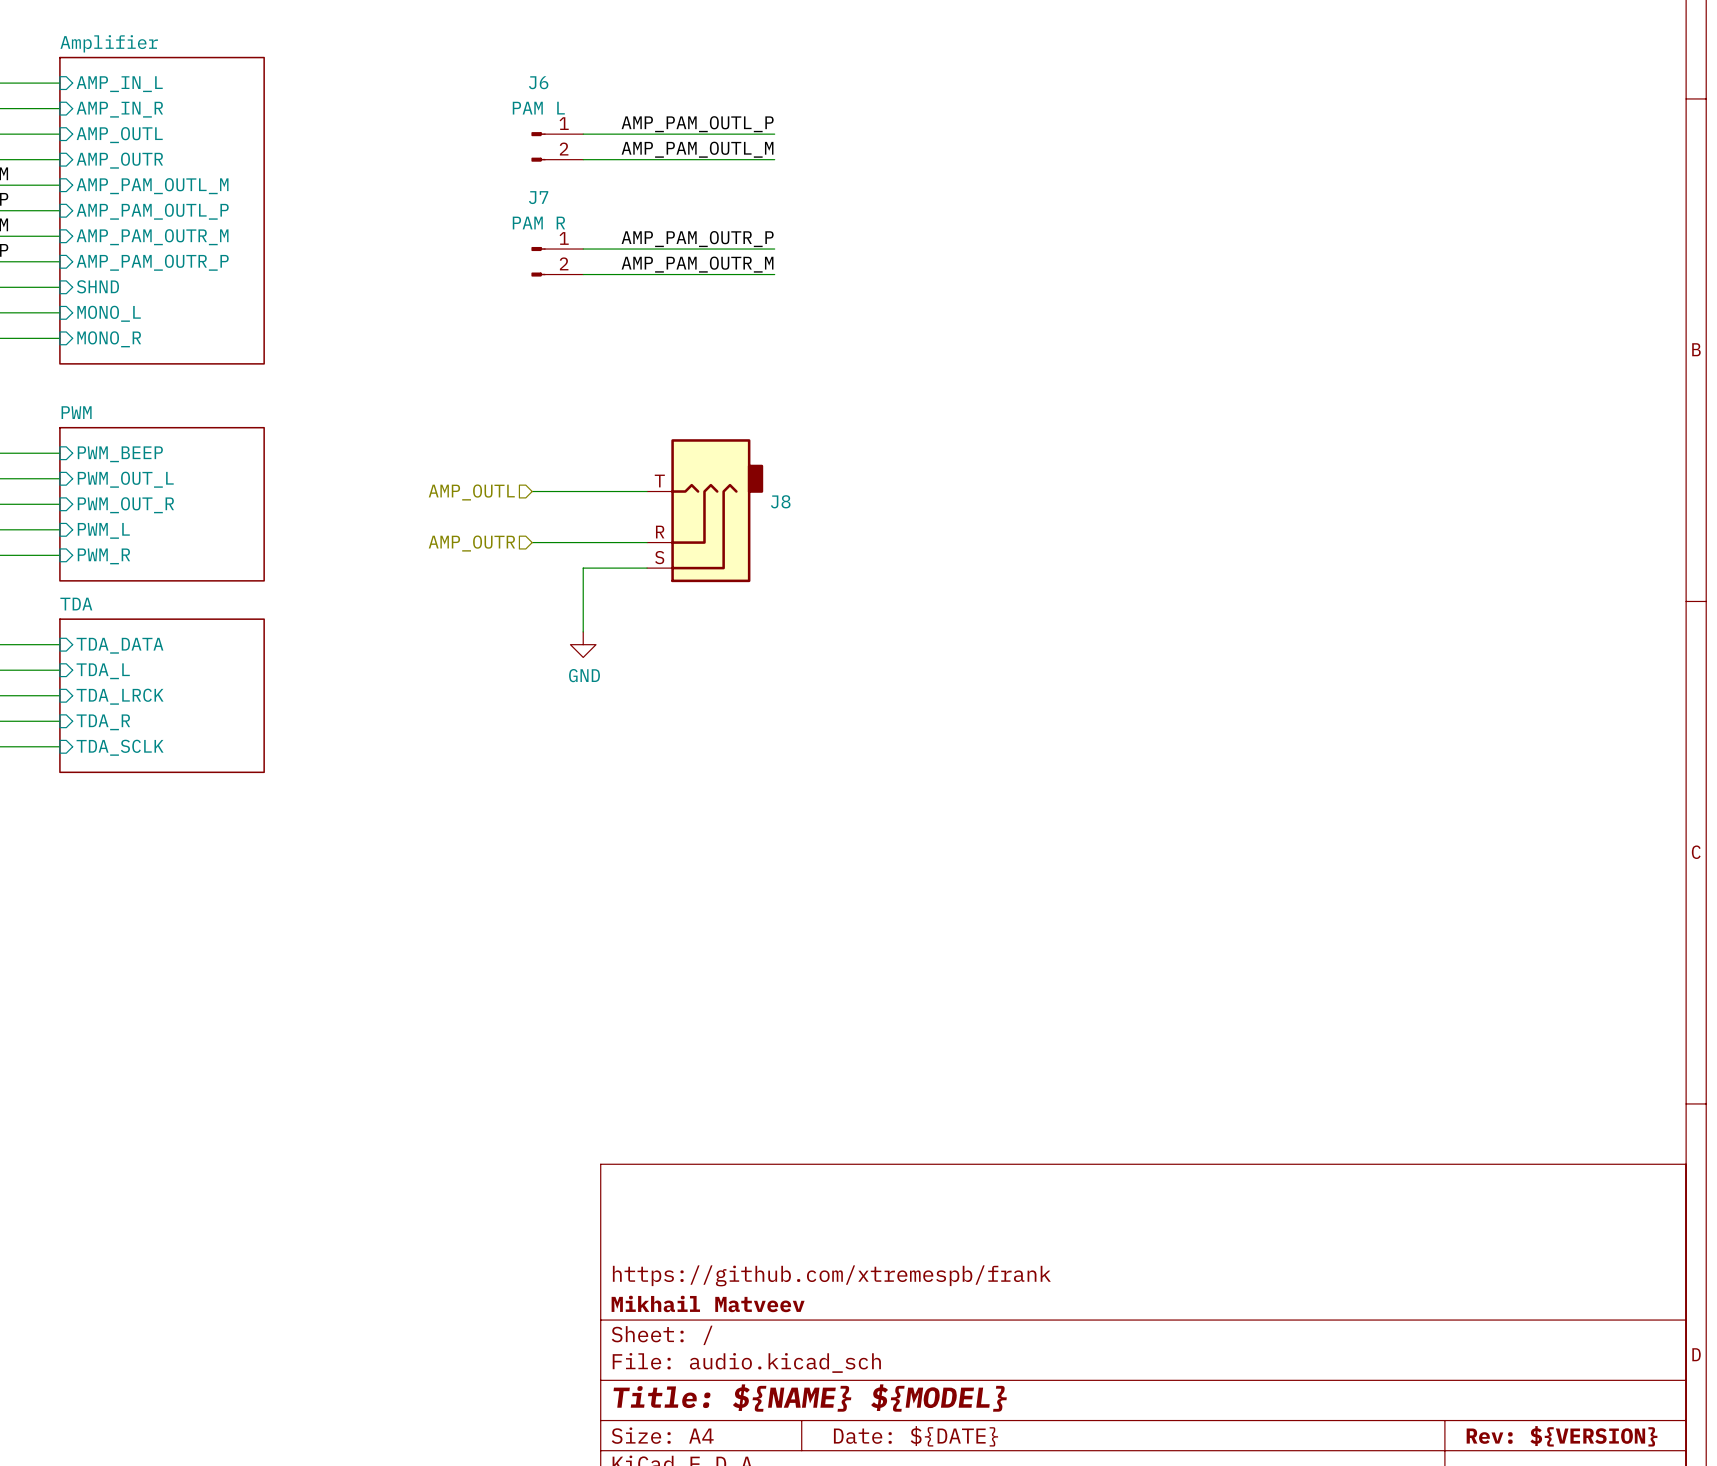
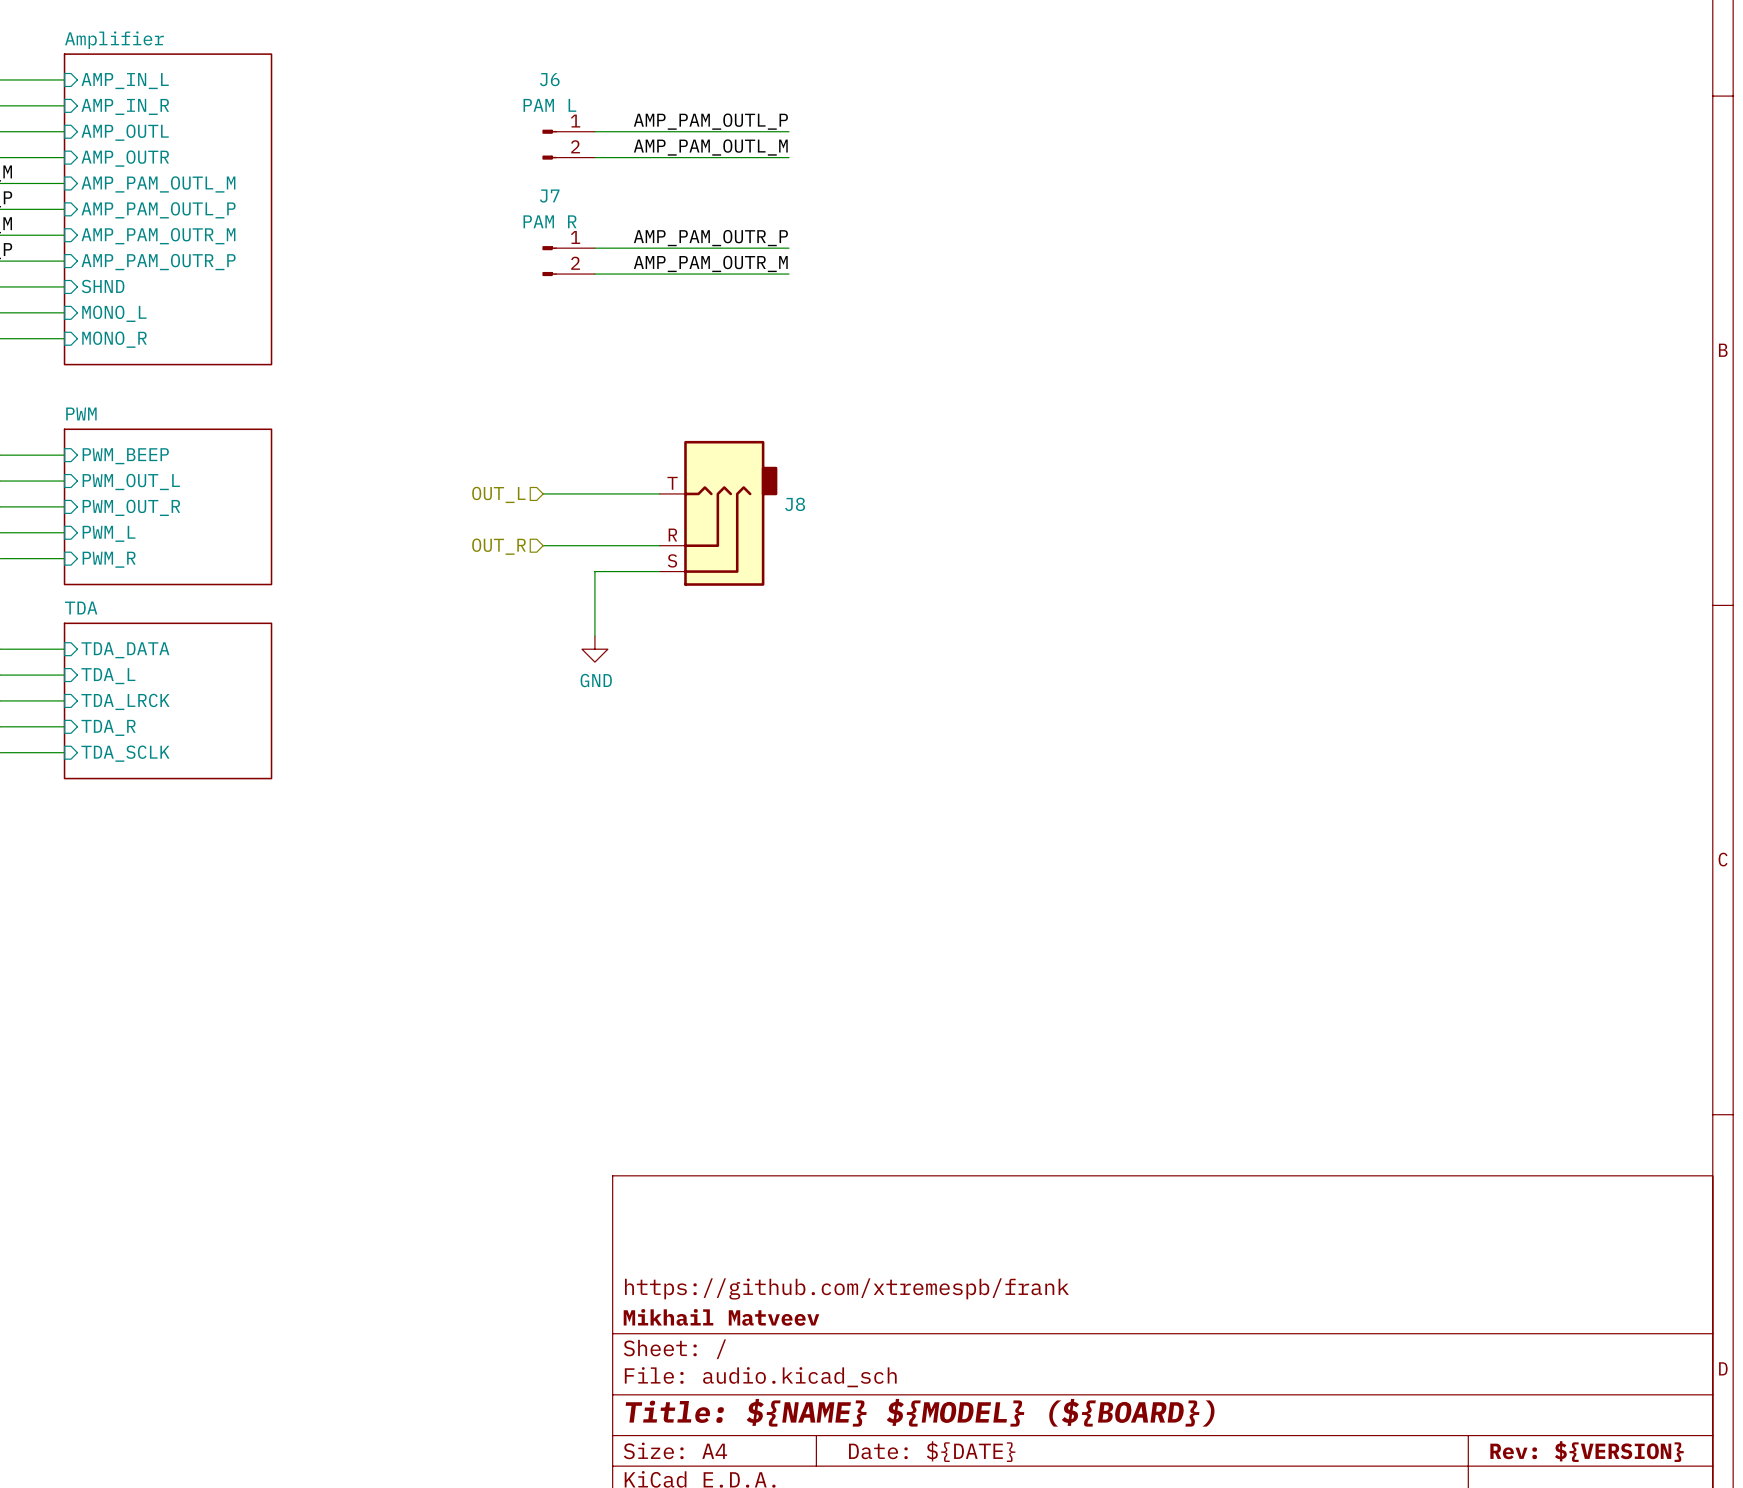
hierarchical label: AMP_OUTL (471, 492) -> OUT_L (498, 494)
hierarchical label: AMP_OUTR (471, 543) -> OUT_R (499, 546)
title block: Title: ${NAME} ${MODEL} (810, 1398) -> Title: ${NAME} ${MODEL} (${BOARD}) (920, 1412)

